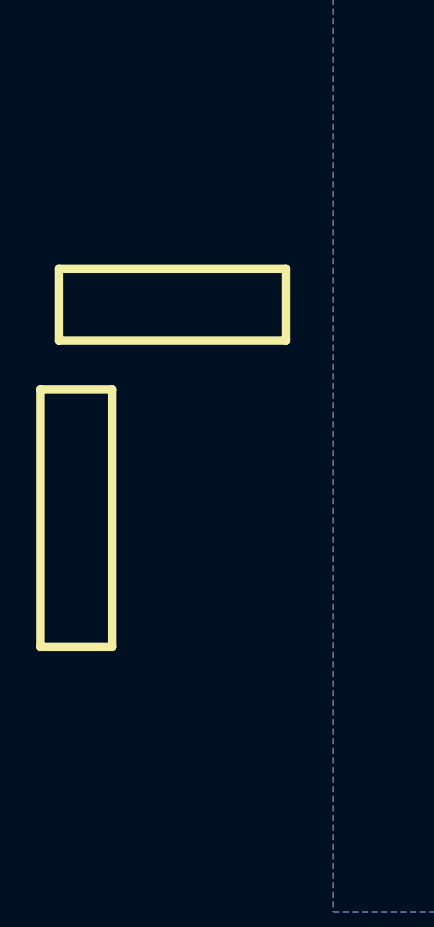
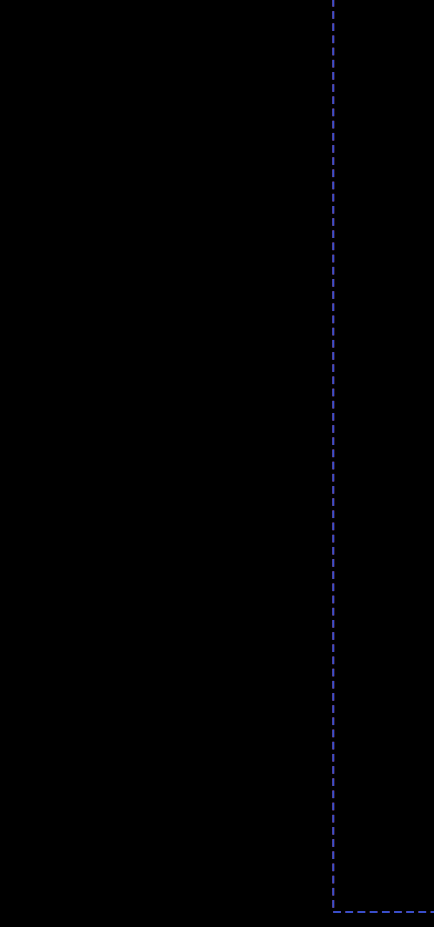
line: (285, 268) (58, 268) (58, 340) (285, 340) (285, 268) -> none
line: (112, 389) (40, 389) (40, 646) (112, 646) (112, 389) -> none

